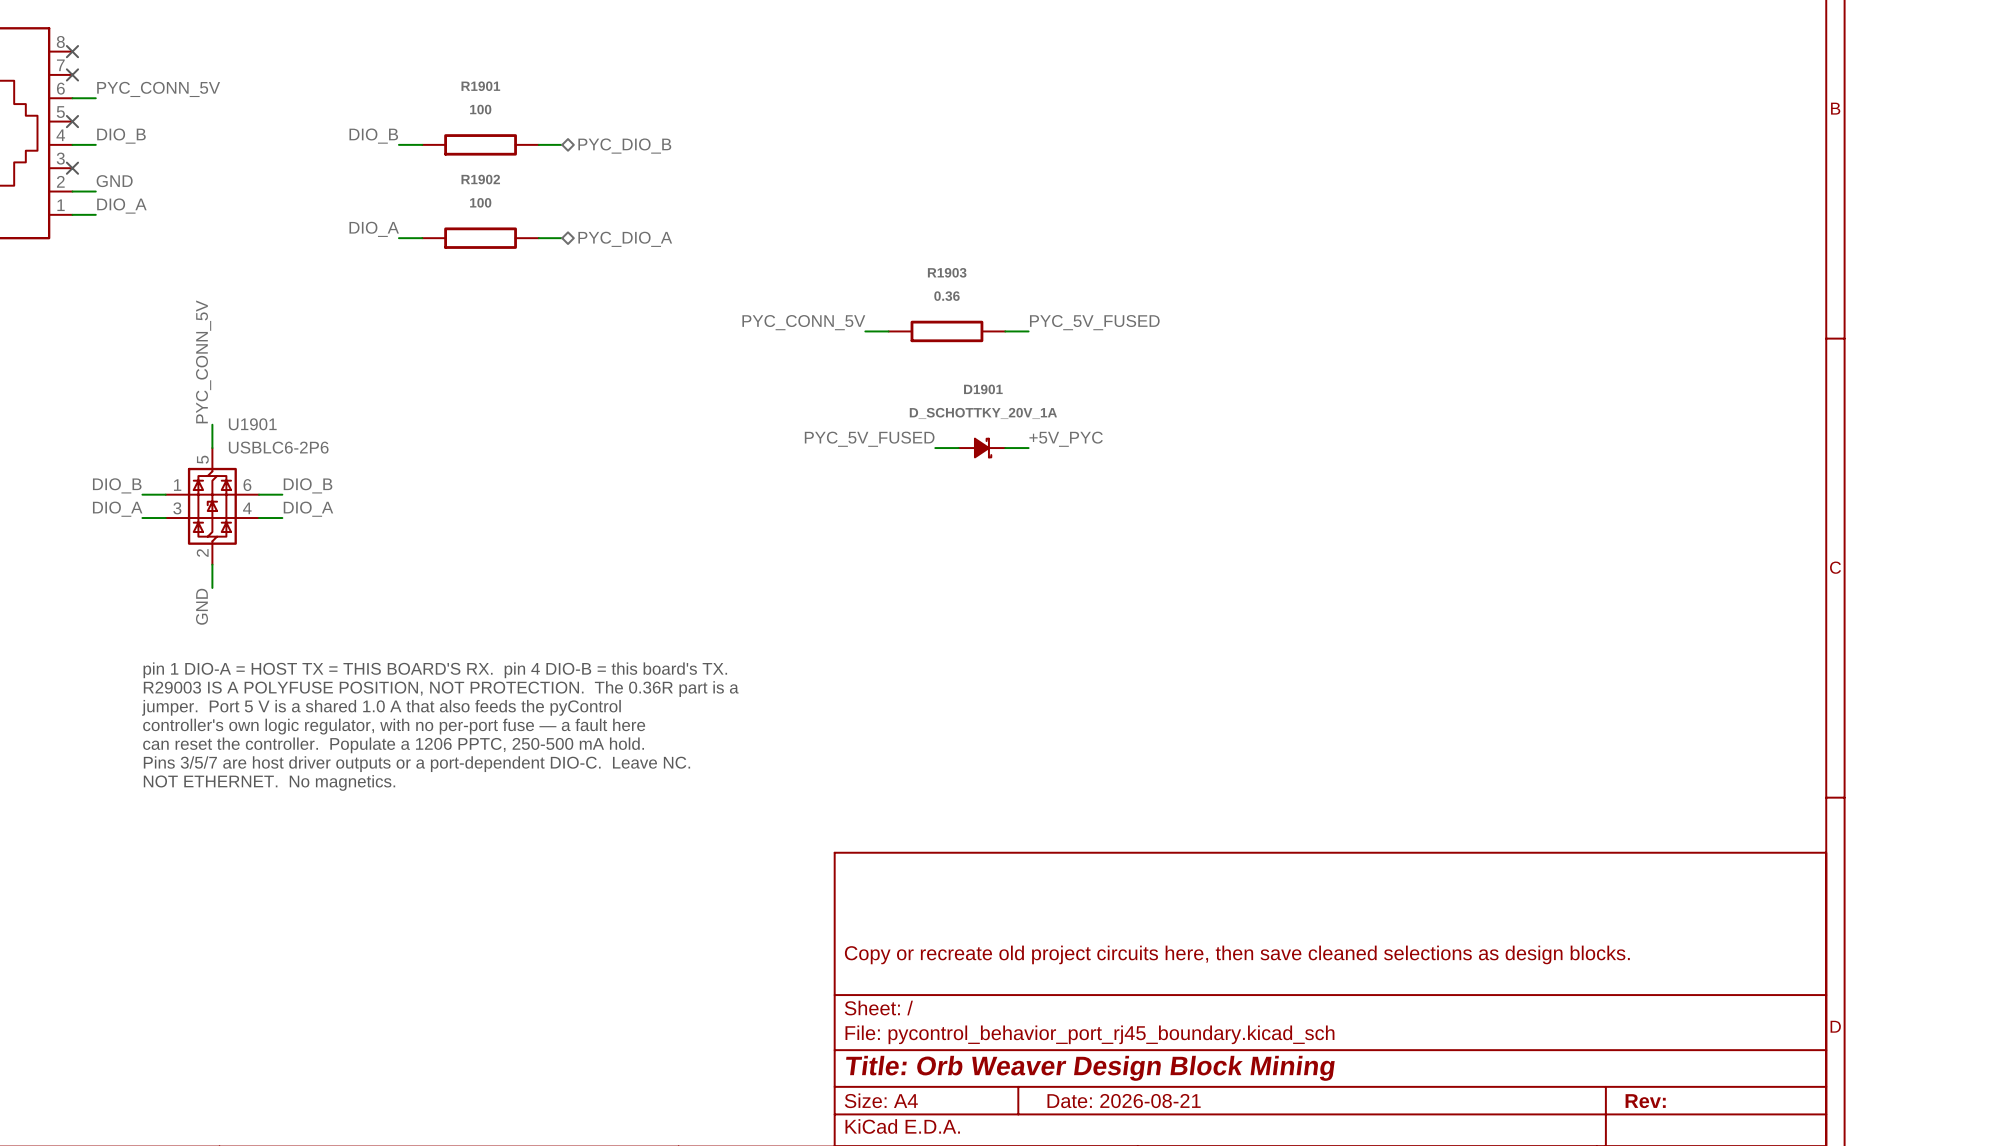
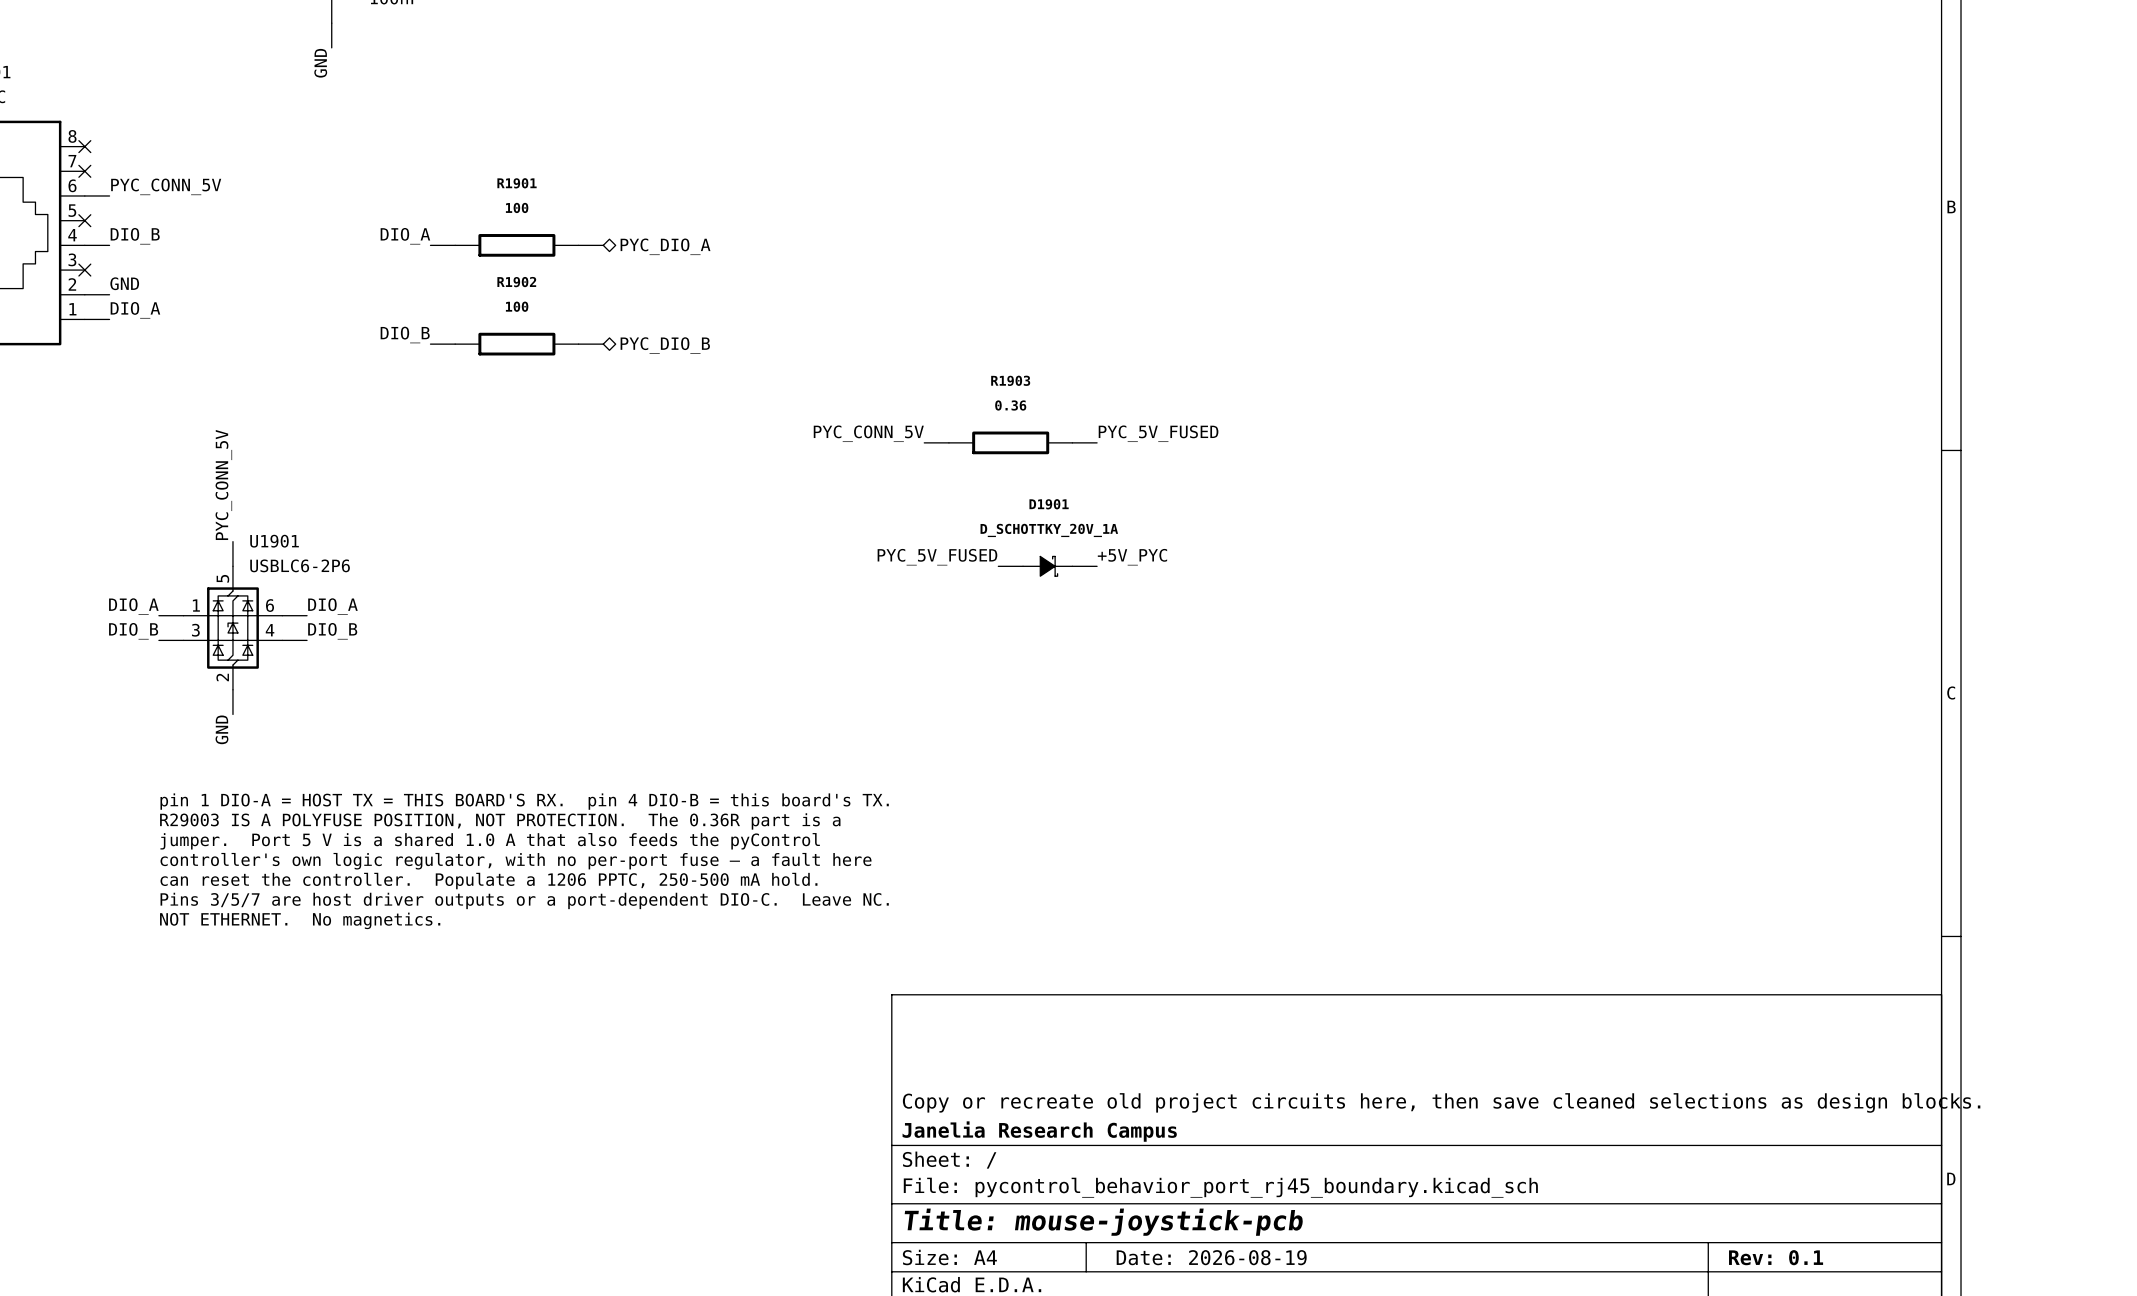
label: DIO_B (373, 136) -> DIO_A (405, 236)
hierarchical label: PYC_DIO_B (624, 146) -> PYC_DIO_A (665, 246)
label: DIO_A (374, 229) -> DIO_B (405, 334)
hierarchical label: PYC_DIO_A (625, 239) -> PYC_DIO_B (665, 345)
label: DIO_B (117, 485) -> DIO_A (133, 606)
label: DIO_B (308, 485) -> DIO_A (332, 606)
label: DIO_A (117, 509) -> DIO_B (133, 631)
label: DIO_A (308, 509) -> DIO_B (332, 631)
title block: none -> Janelia Research Campus (1039, 1131)
title block: Title: Orb Weaver Design Block Mining (1090, 1068) -> Title: mouse-joystick-pcb (1103, 1222)
title block: Date: 2026-08-21 (1124, 1101) -> Date: 2026-08-19 (1211, 1257)
title block: Rev: (1645, 1101) -> Rev: 0.1 (1776, 1257)

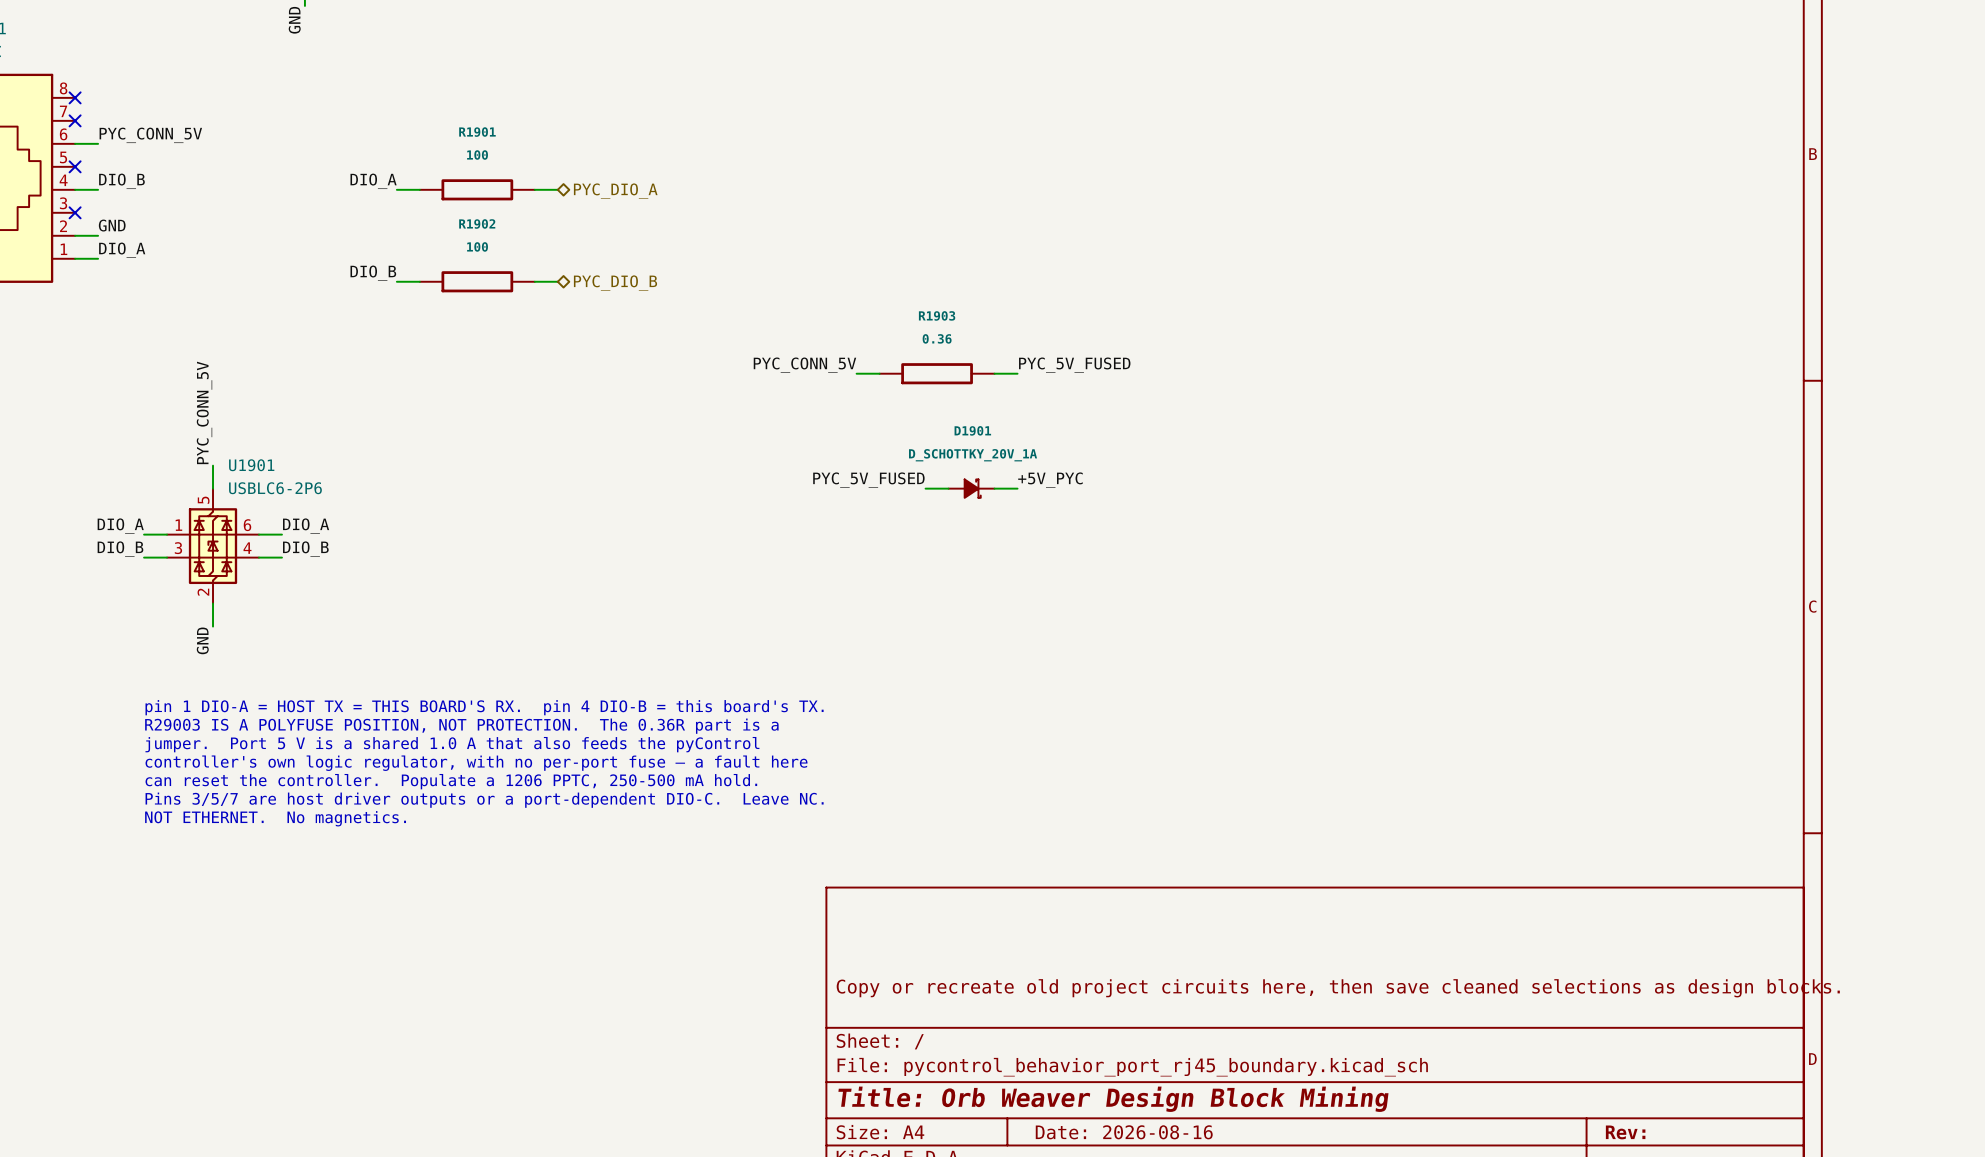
title block: Janelia Research Campus (1039, 1131) -> none
title block: Title: mouse-joystick-pcb (1103, 1222) -> Title: Orb Weaver Design Block Mining (1113, 1099)
title block: Date: 2026-08-19 (1211, 1257) -> Date: 2026-08-16 (1124, 1132)
title block: Rev: 0.1 (1776, 1257) -> Rev: (1625, 1132)

